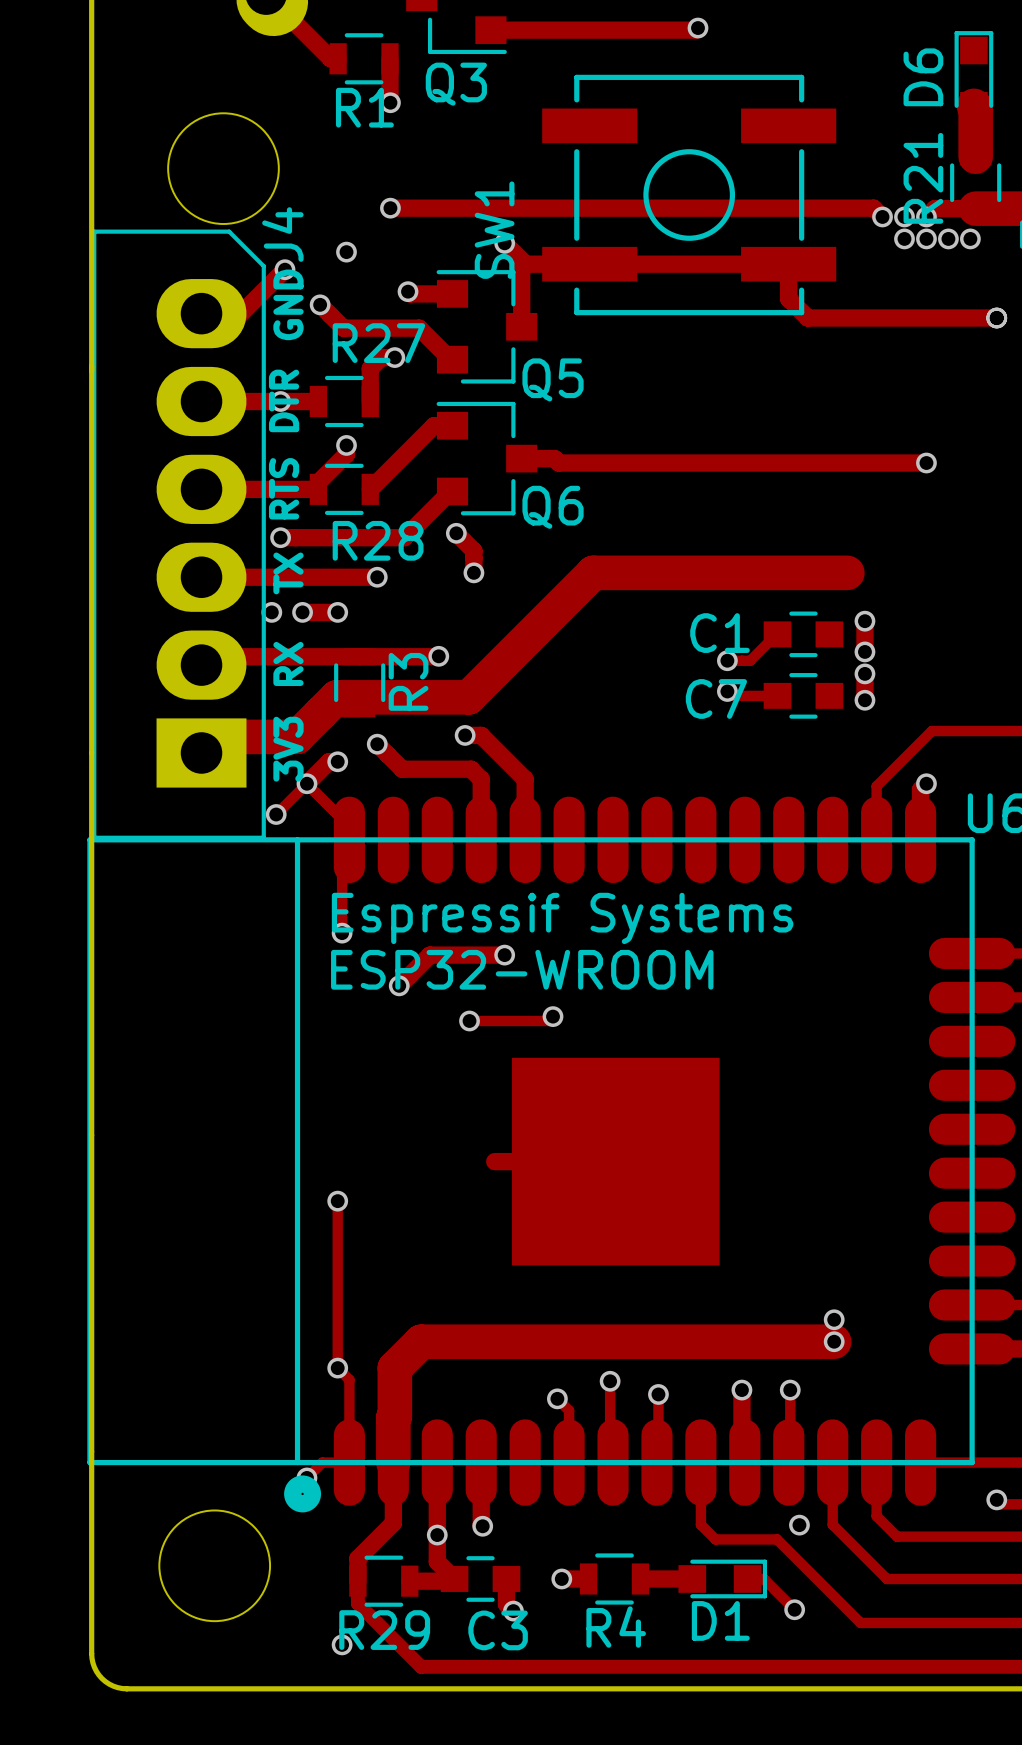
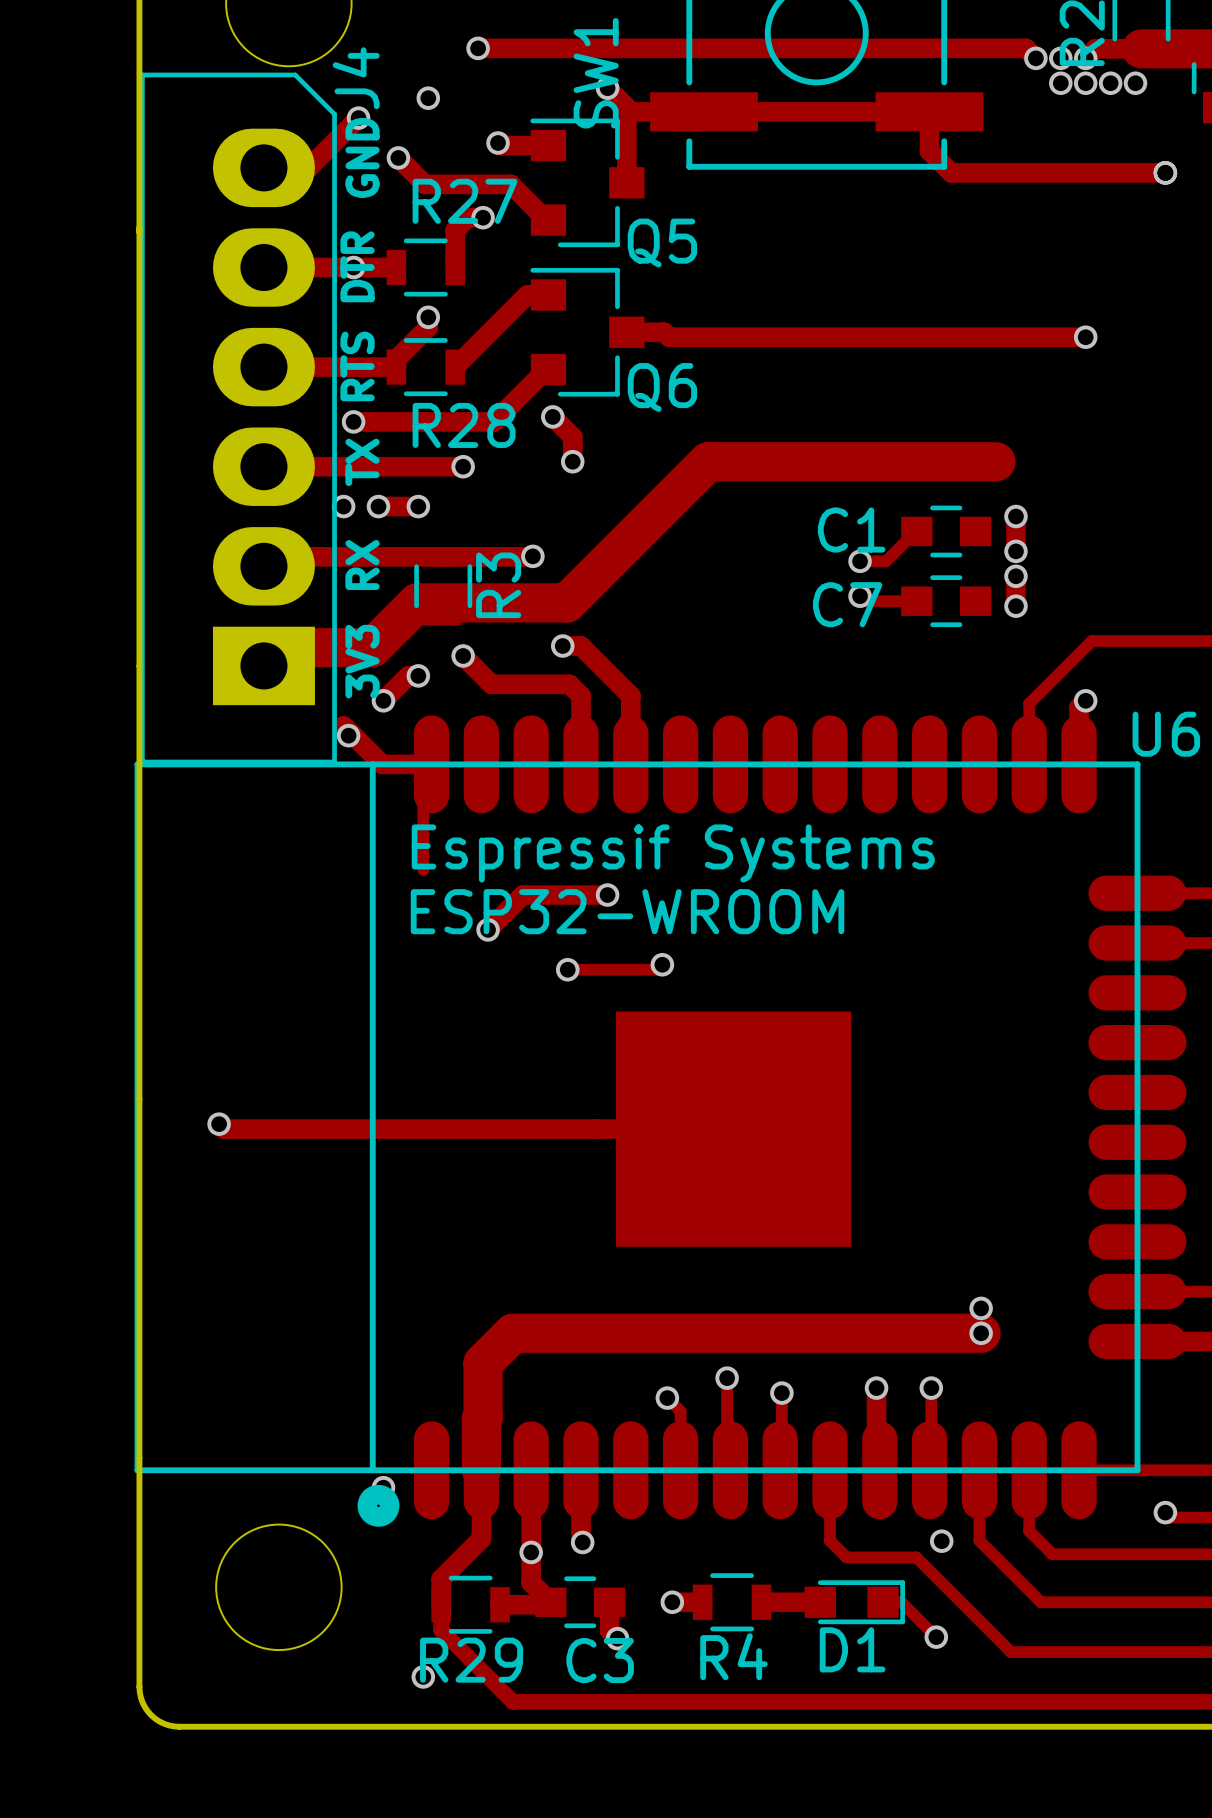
track: (276, 814) (306, 783) (349, 826) (349, 839) -> (343, 725) (382, 764) (431, 764)
via: (342, 933) -> none
track: none -> (219, 1124) (224, 1129) (596, 1129)
via: none -> (219, 1124)
track: (337, 1201) (337, 1368) (349, 1379) (349, 1462) (322, 1462) (306, 1477) -> none
via: (337, 1201) -> none
via: (337, 1368) -> none

